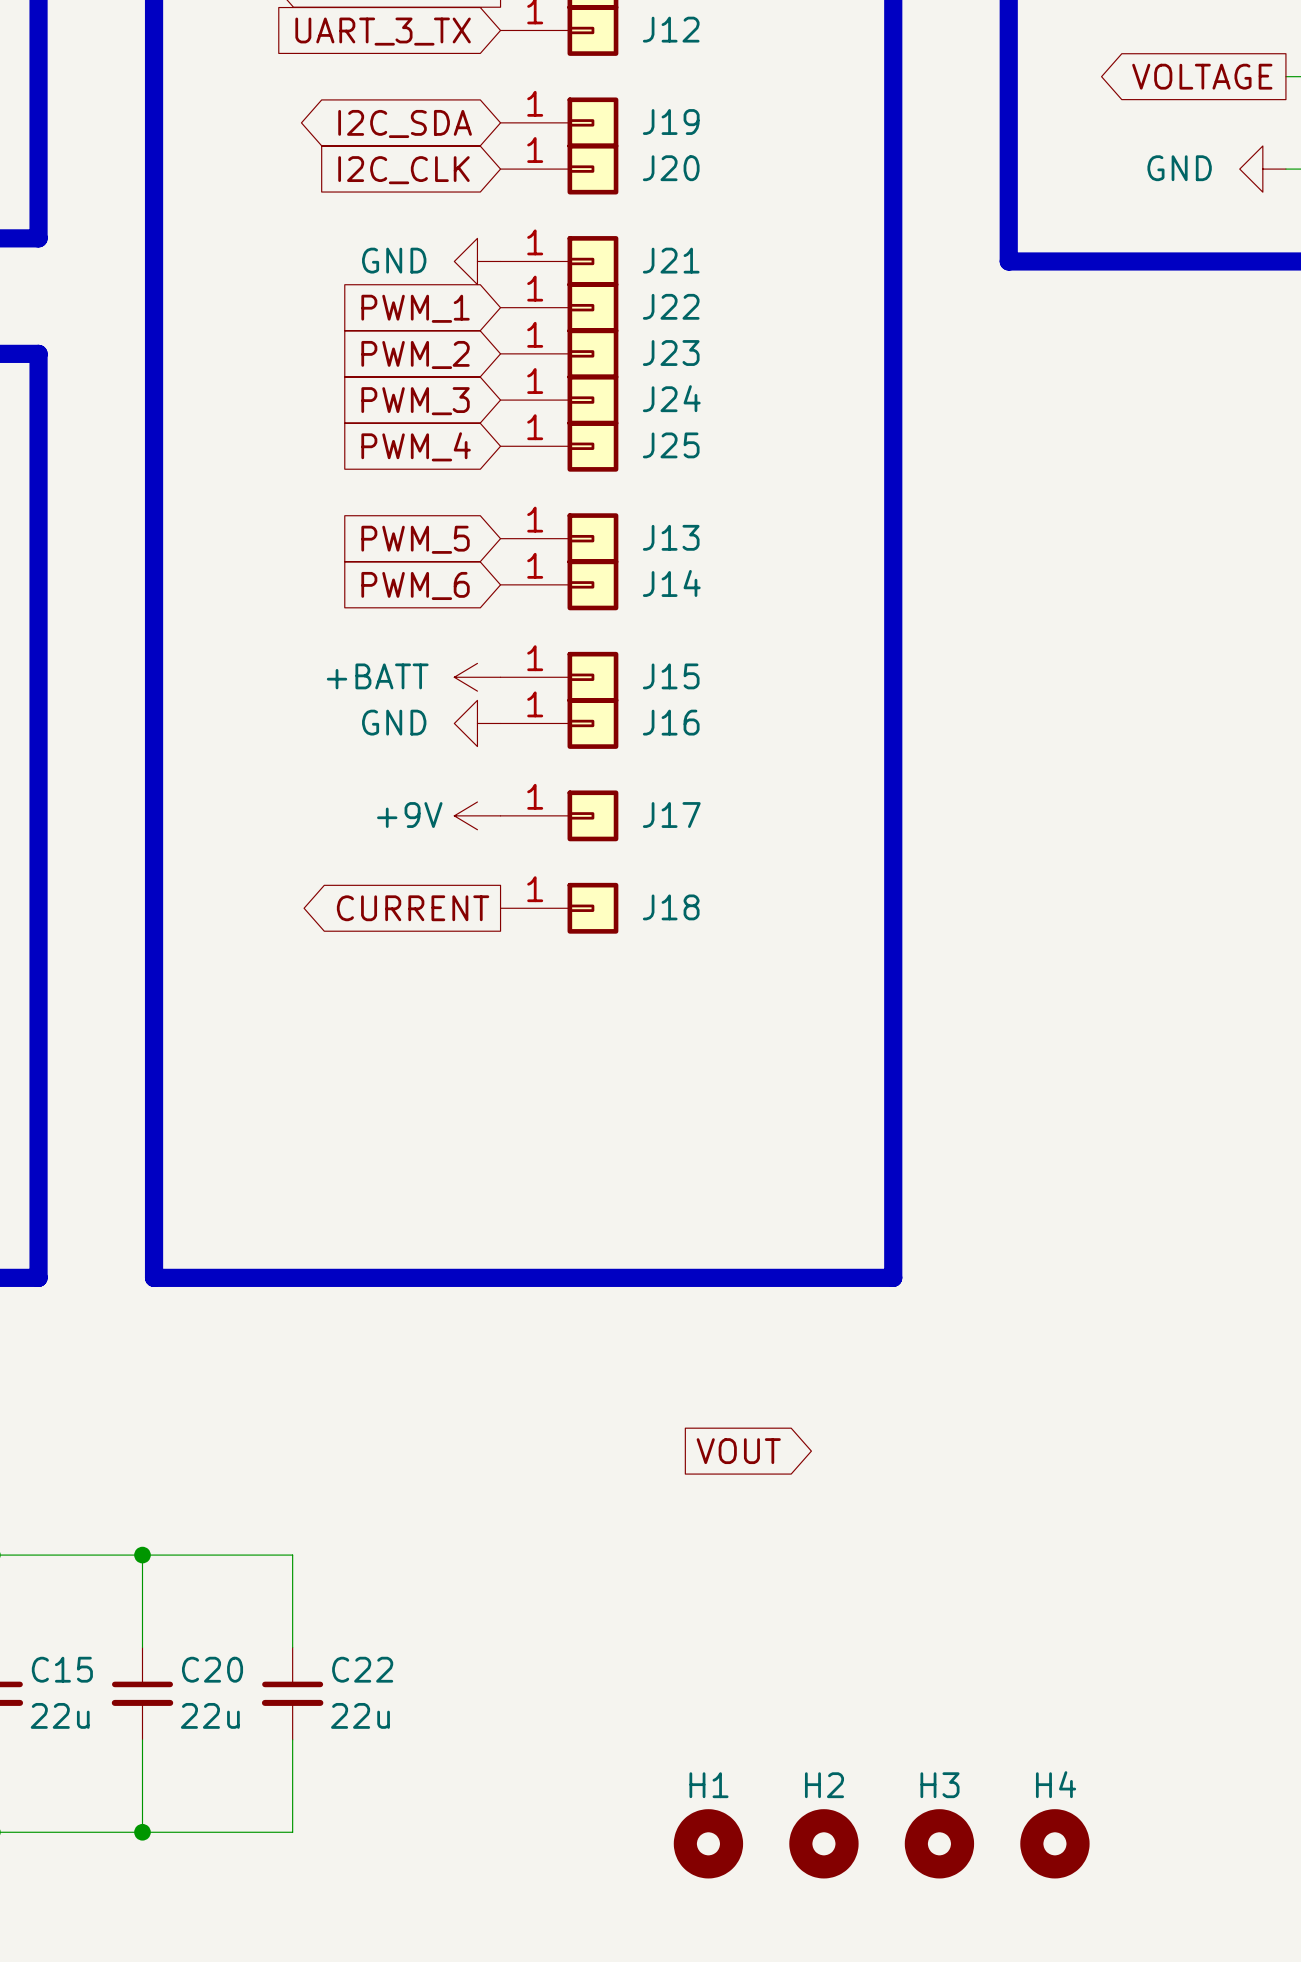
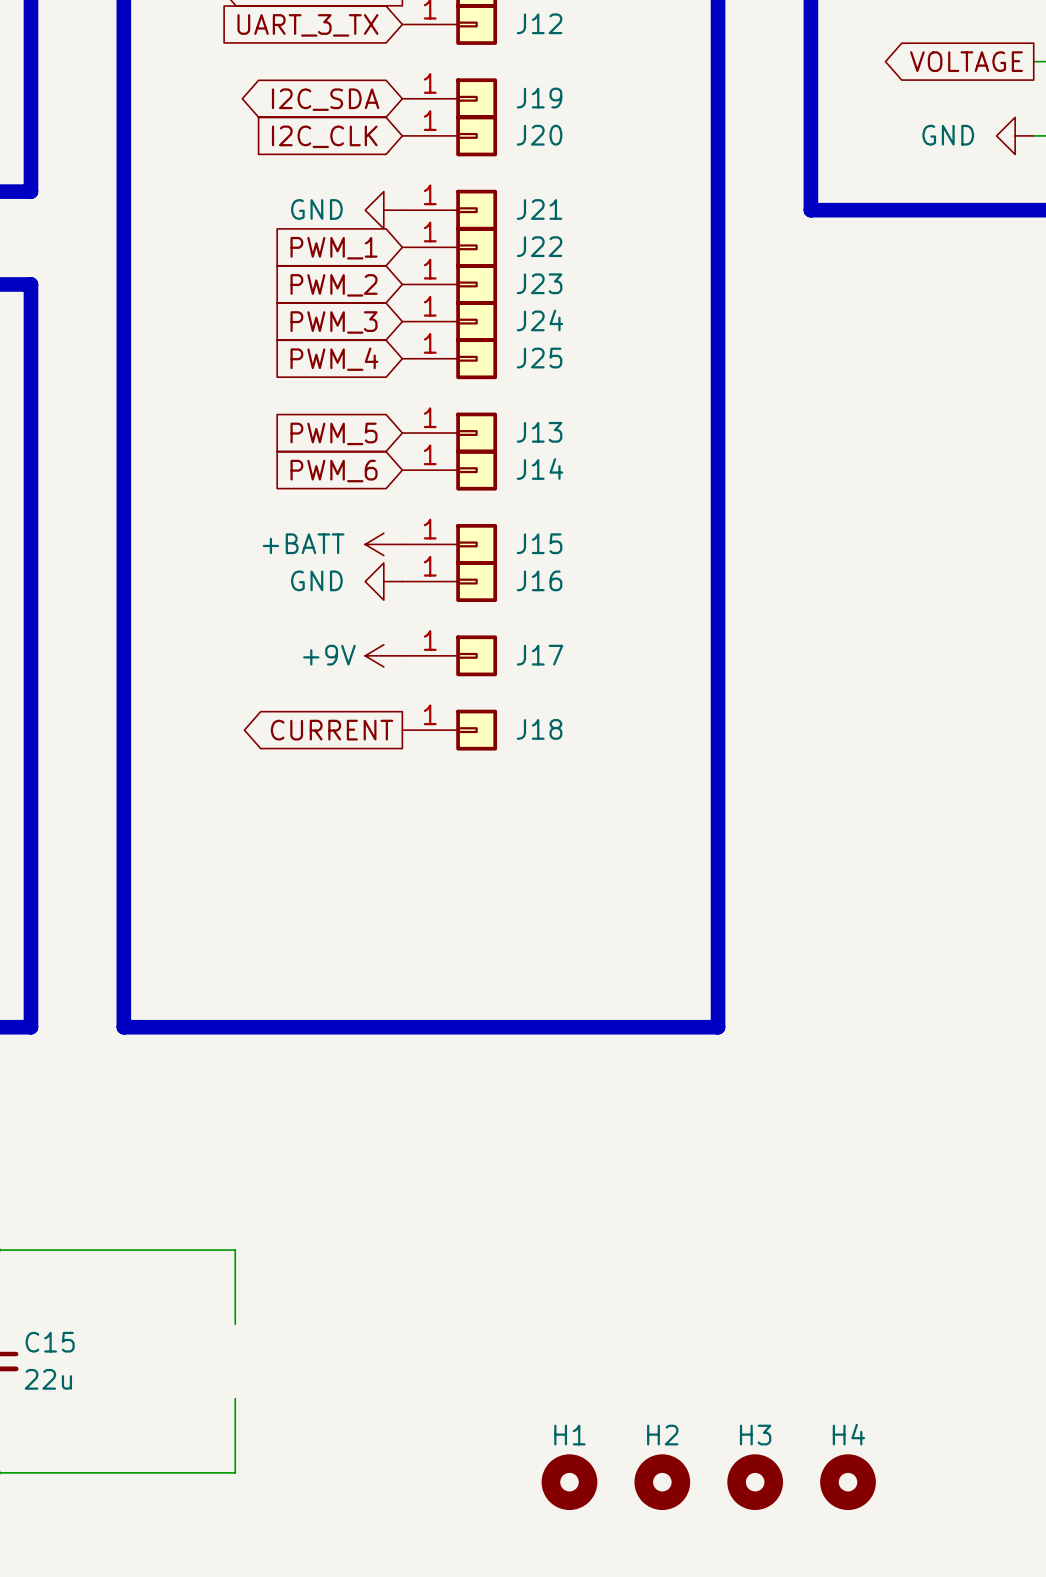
global label: VOUT (738, 1451) -> none
wire: (142, 1555) (142, 1647) -> none
junction: (142, 1555) -> none
C20: 22u (142, 1693) -> none
C22: 22u (292, 1693) -> none
wire: (142, 1739) (142, 1832) -> none
junction: (142, 1832) -> none

